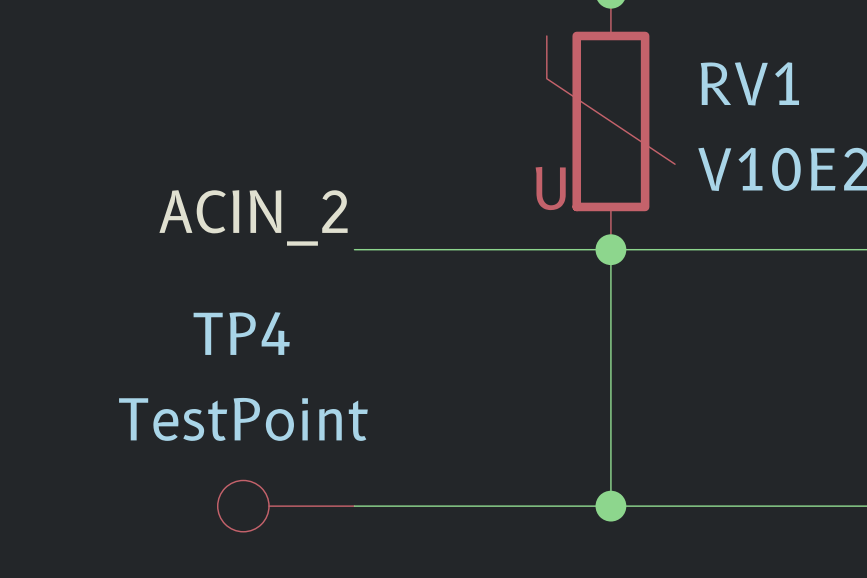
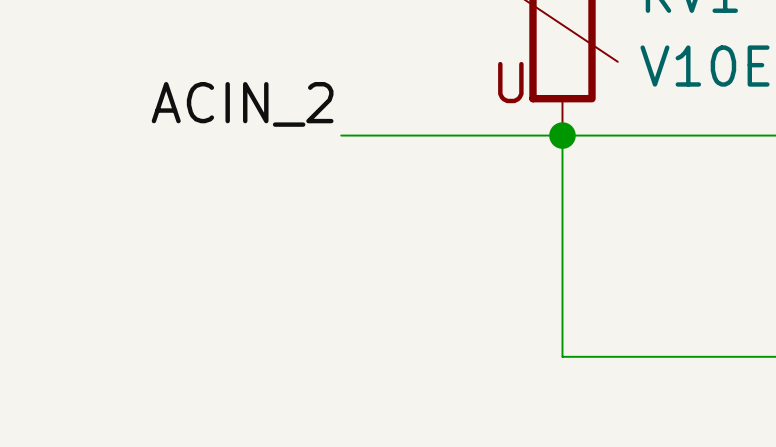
TP4: TestPoint (286, 506) -> none
wire: (354, 506) (610, 506) -> none
junction: (610, 506) -> none

